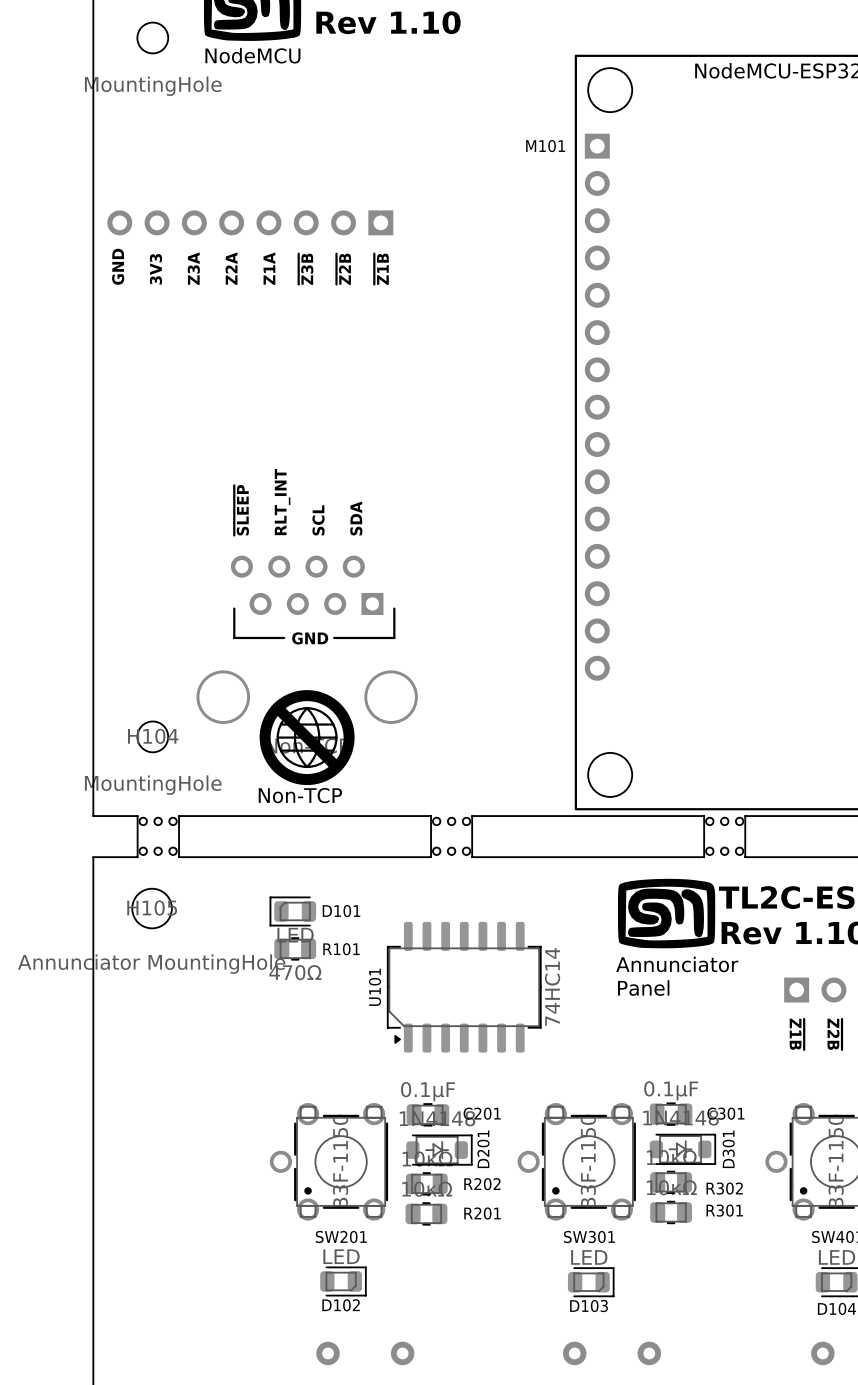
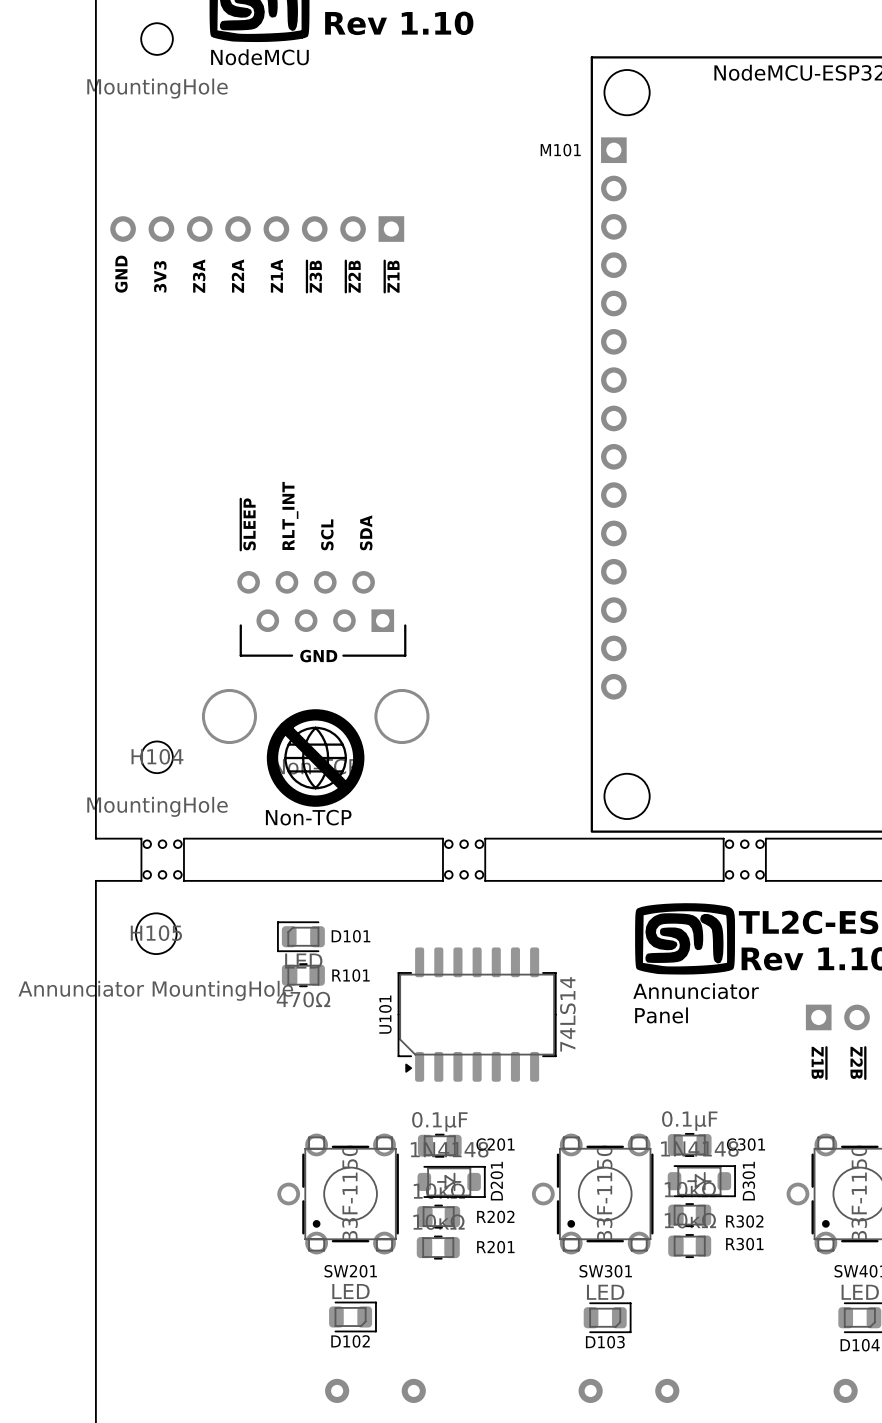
U101 value: 74HC14 (552, 986) -> 74LS14 (567, 1014)

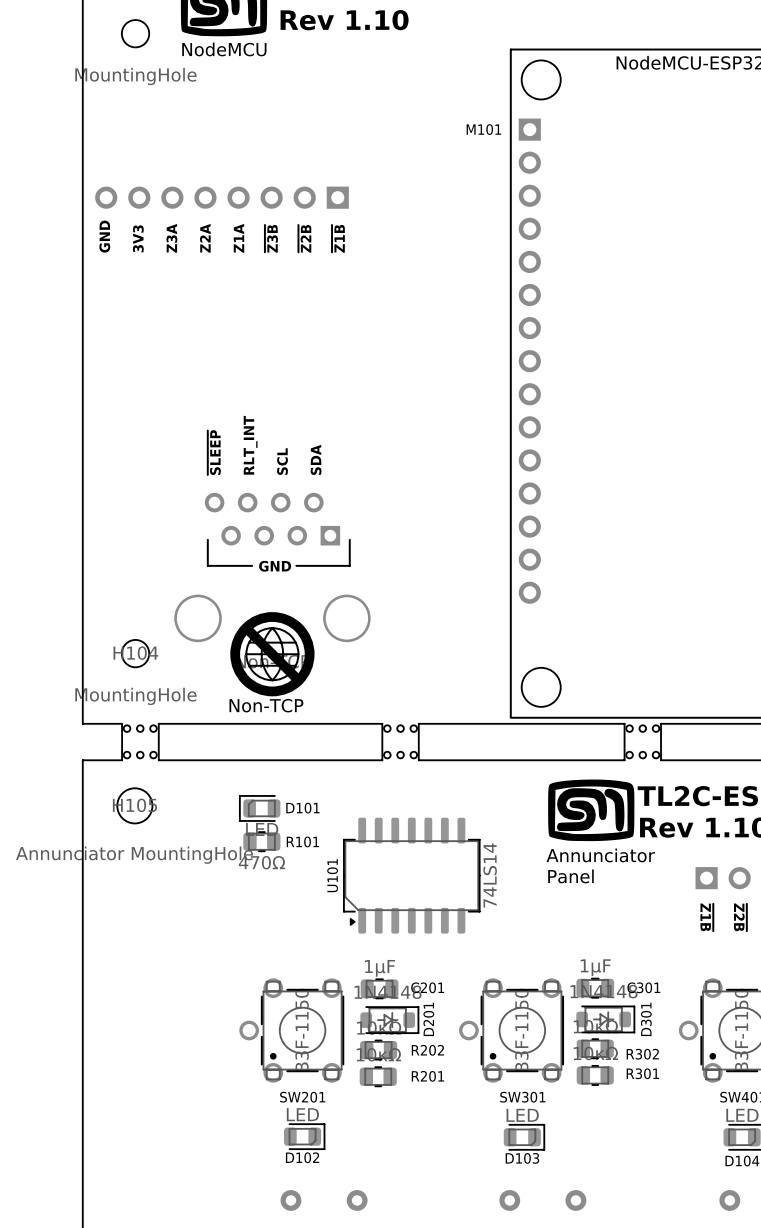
C201 value: 0.1μF (439, 1121) -> 1μF (380, 968)
C301 value: 0.1μF (689, 1121) -> 1μF (595, 967)

